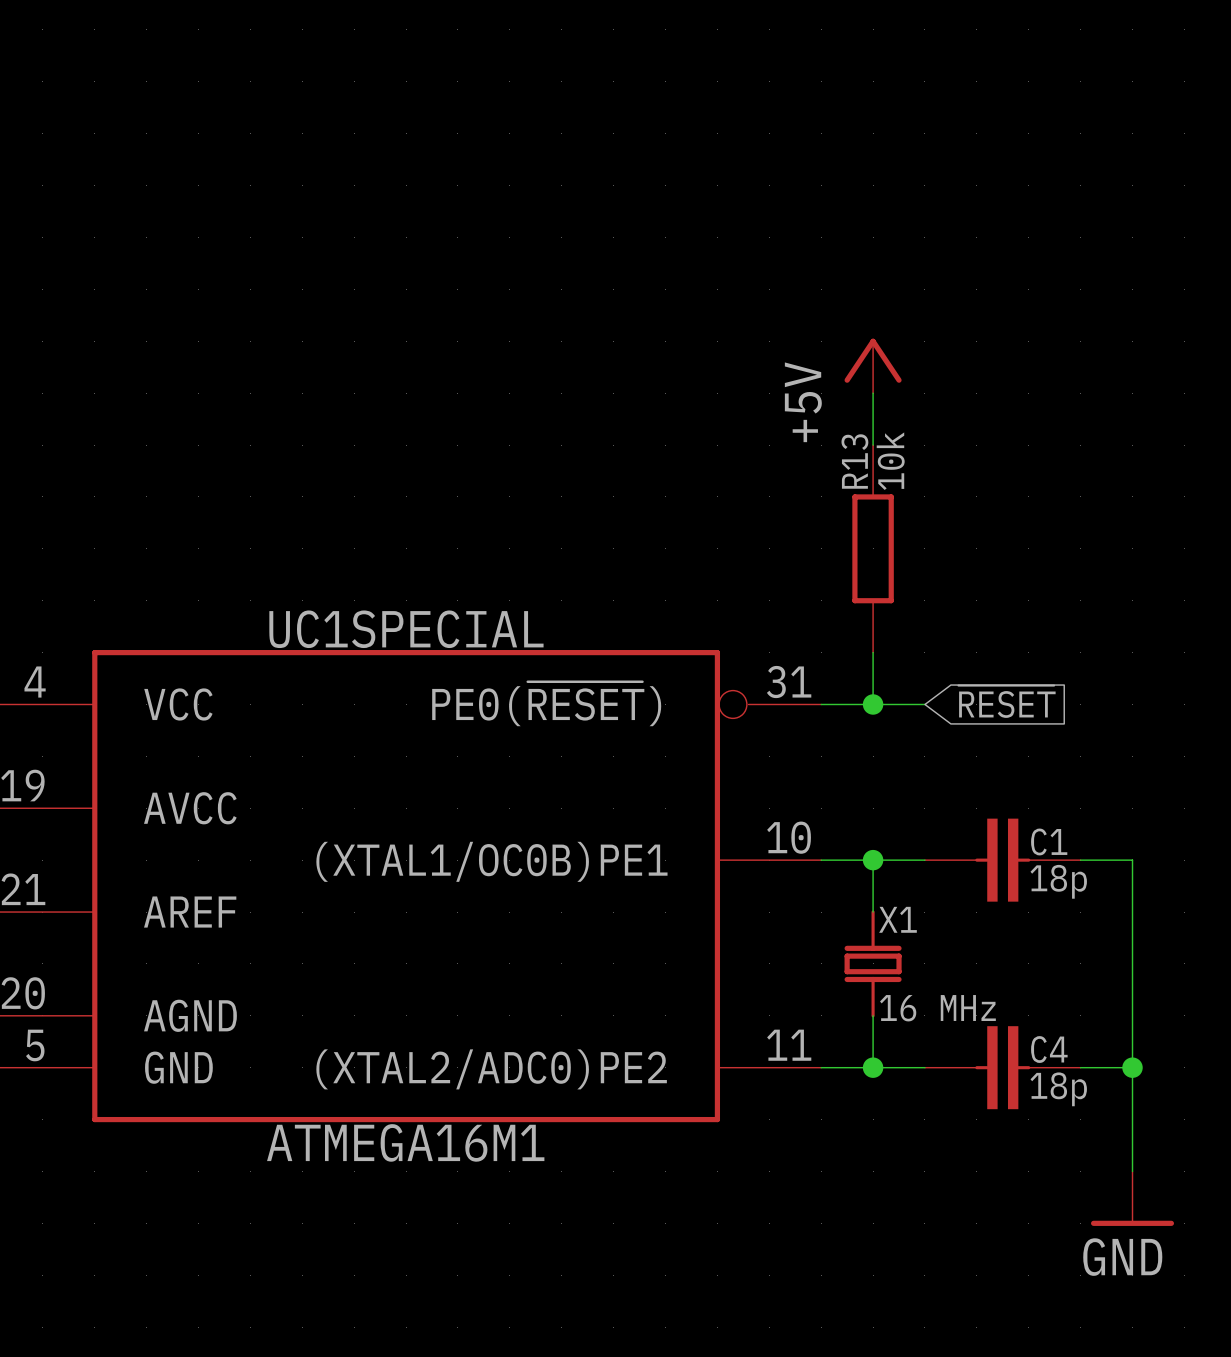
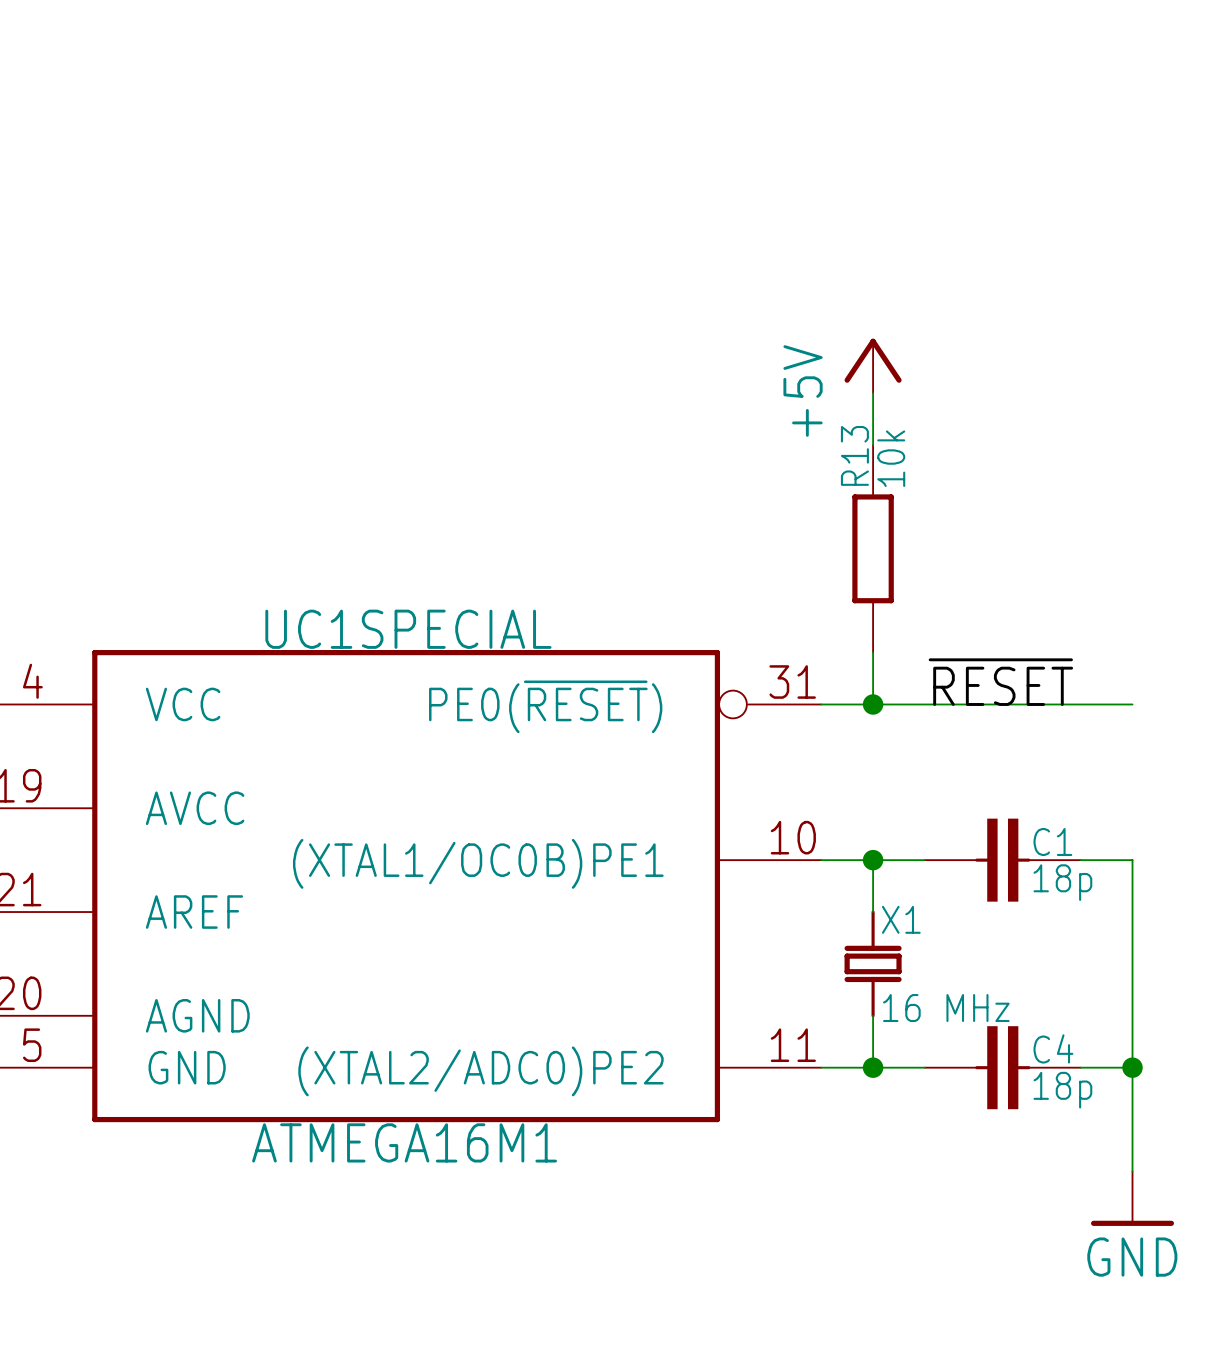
label: none -> ~{RESET} (1000, 682)
global label: ~{RESET} (1007, 701) -> none
wire: none -> (924, 704) (1132, 704)

